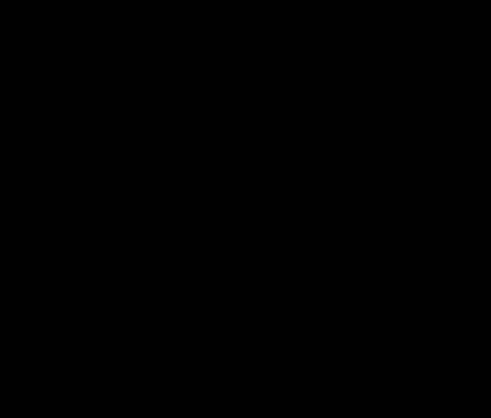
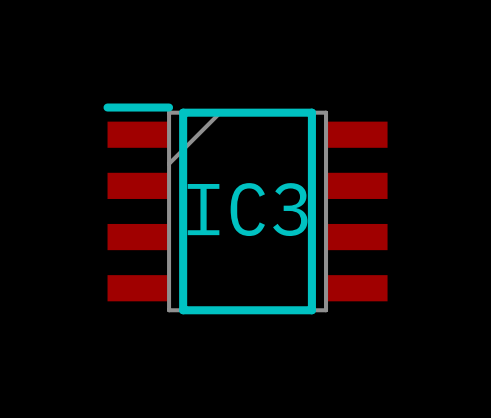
IC3: none -> (245, 208)

